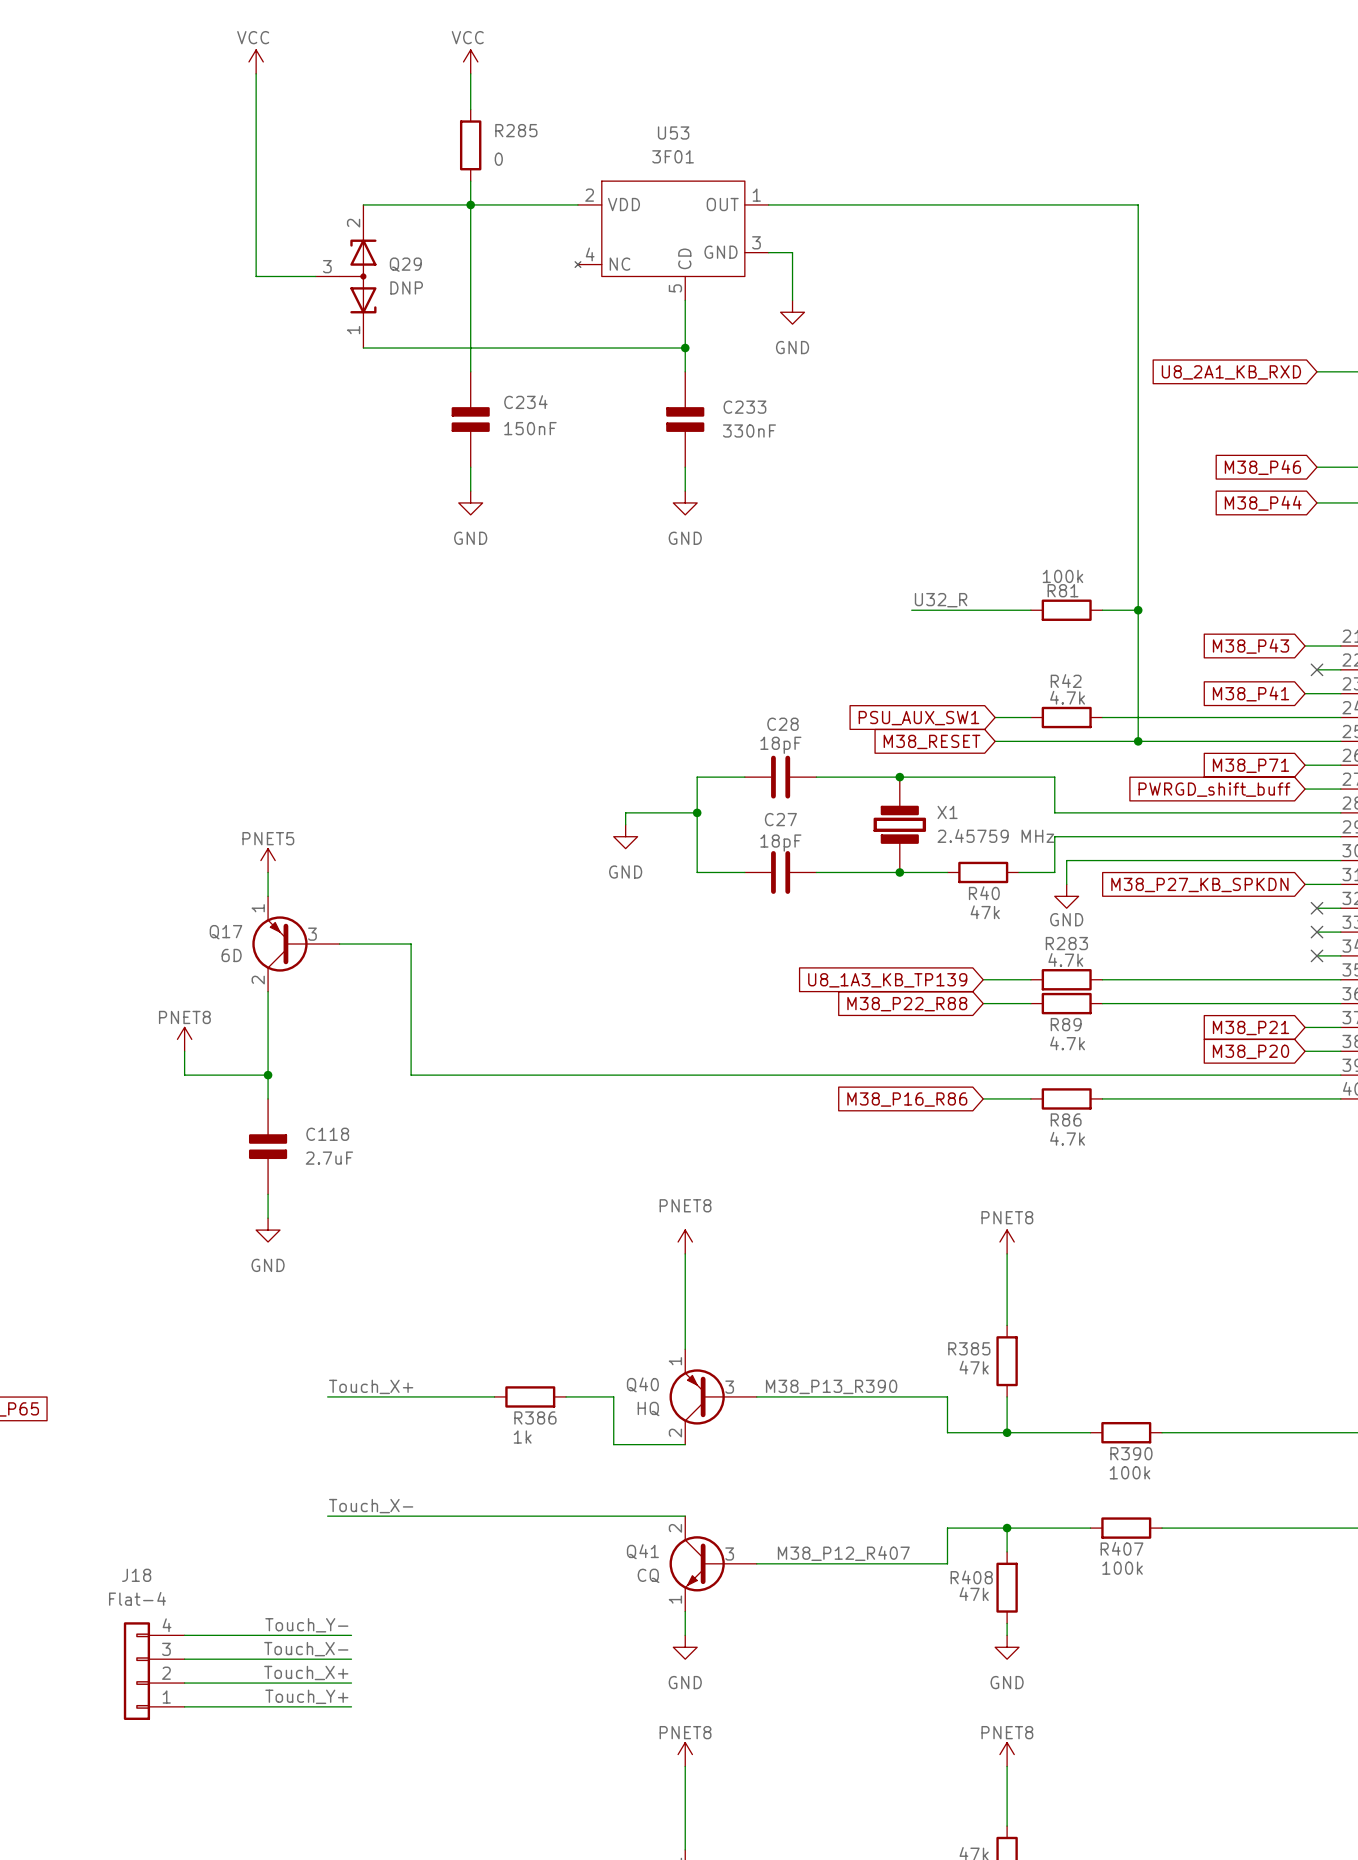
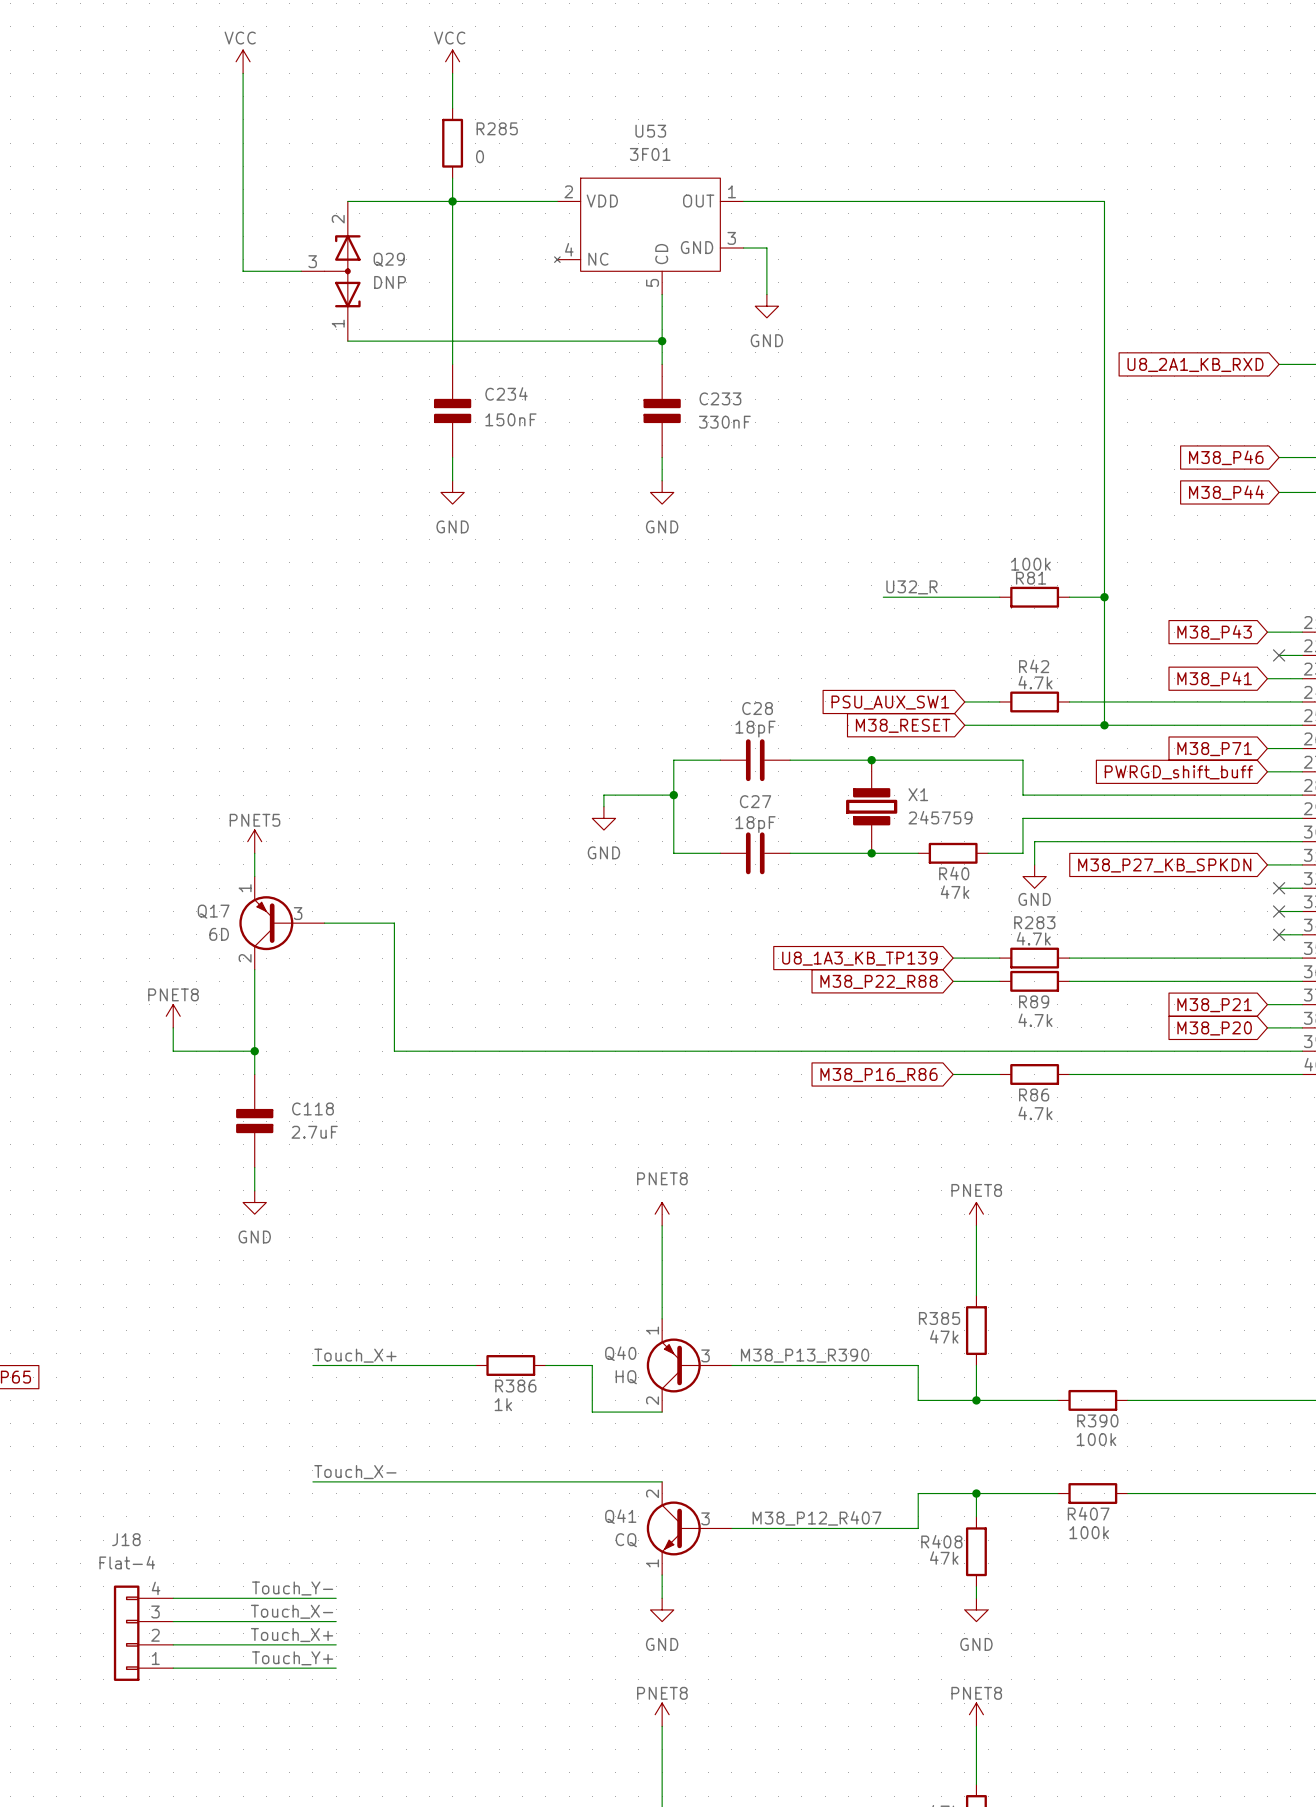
X1 value: 2.45759 MHz (995, 835) -> 245759 (940, 817)

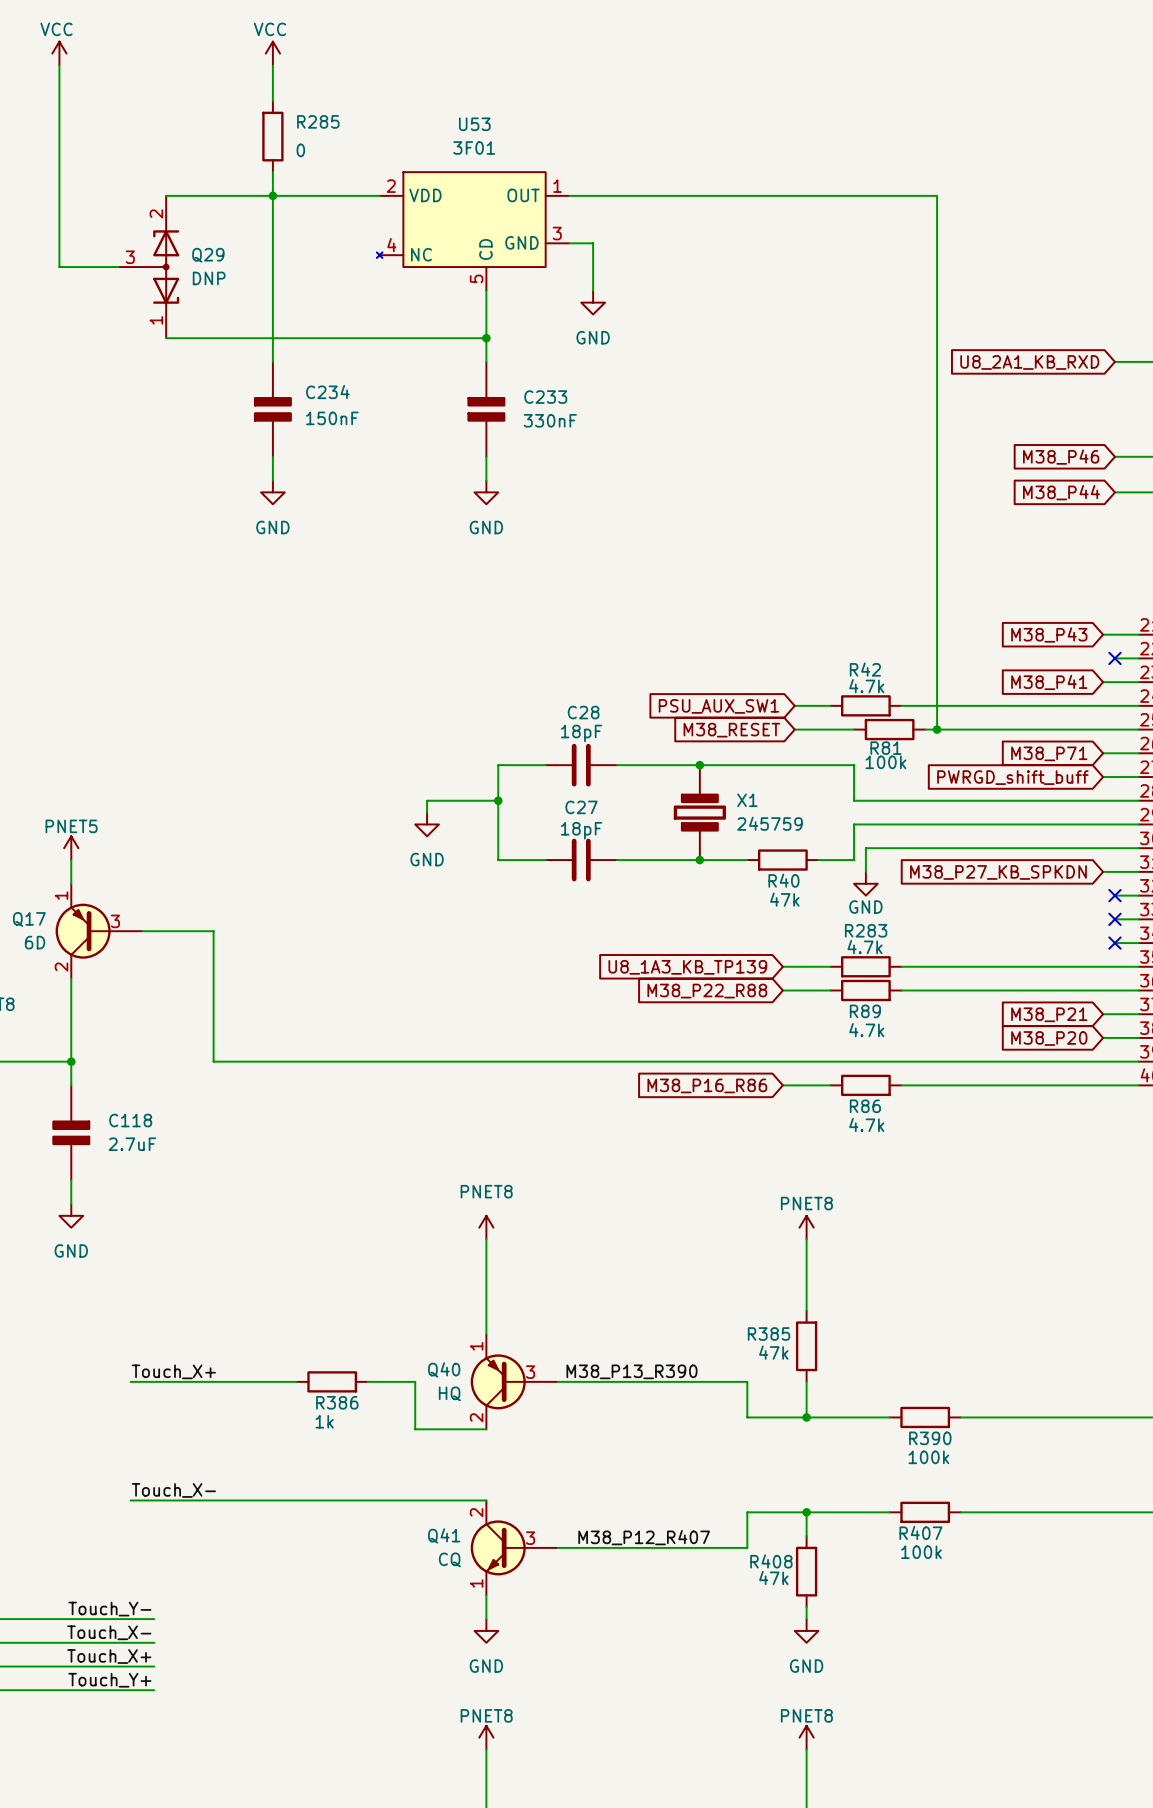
R81 value position: 100k (1031, 564) -> 100k (885, 762)
R81 name position: R81 (1031, 578) -> R81 (885, 748)
label: U32_R (911, 587) -> none
wire: (883, 597) (999, 597) -> none
R81 position: (1034, 597) -> (889, 729)
wire: (1069, 597) (1104, 597) -> none
junction: (1104, 597) -> none
wire: (1022, 725) (1092, 725) -> none

